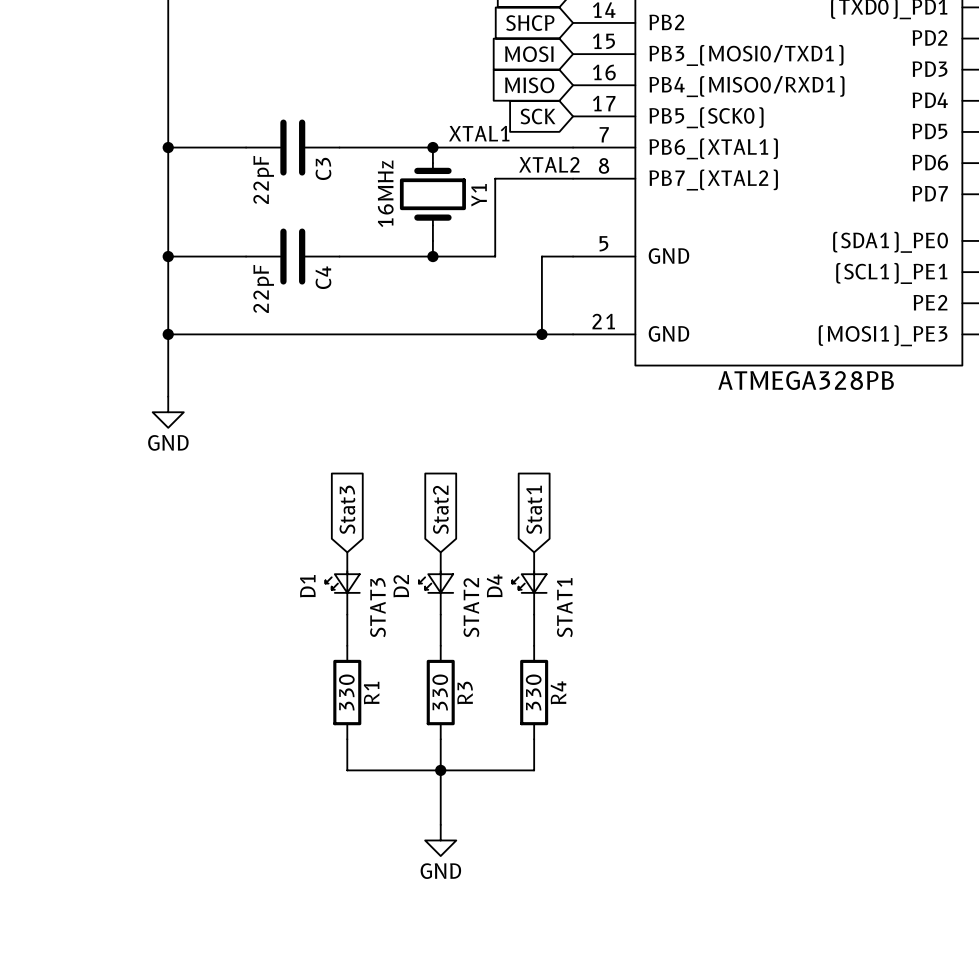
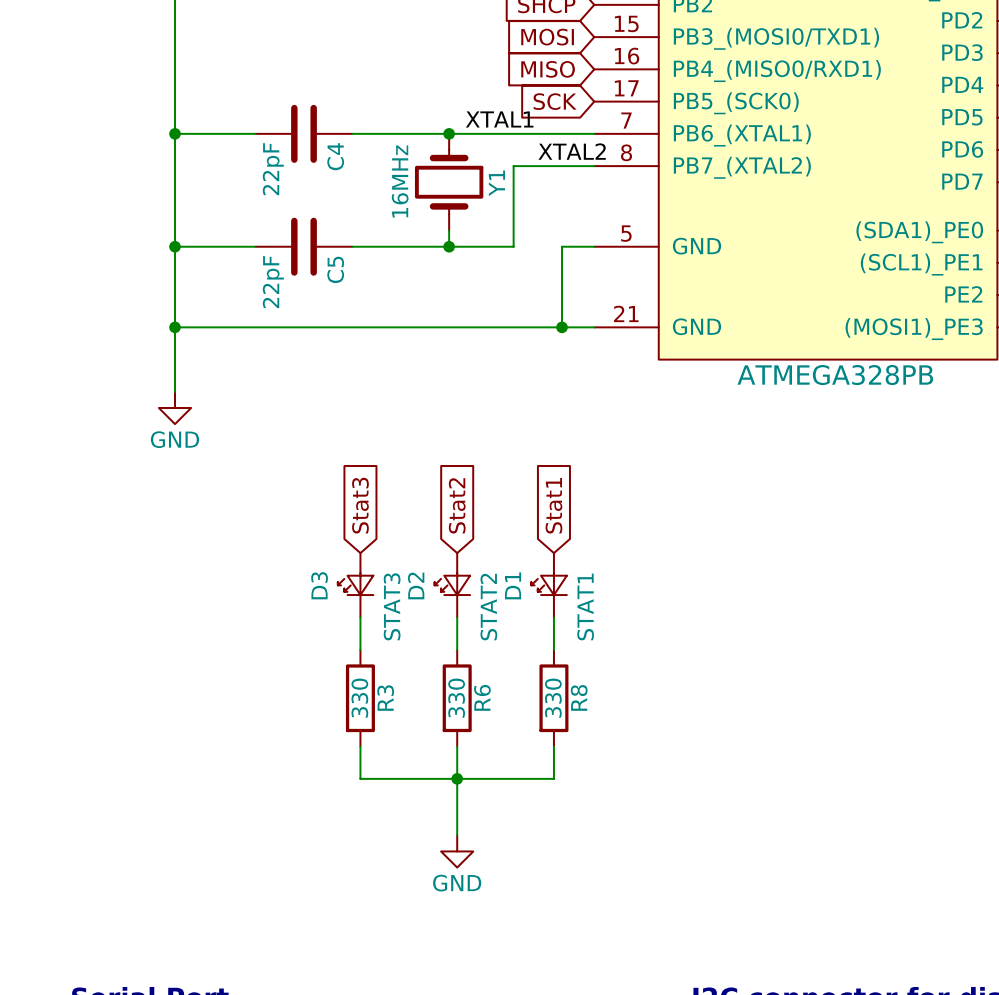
C3 name: C3 (323, 168) -> C4 (335, 156)
C4 name: C4 (323, 277) -> C5 (335, 269)
D4 name: D4 (494, 585) -> D1 (513, 585)
D1 name: D1 (307, 586) -> D3 (319, 585)
R3 name: R3 (465, 692) -> R6 (482, 697)
R4 name: R4 (558, 692) -> R8 (579, 697)
R1 name: R1 (371, 693) -> R3 (385, 698)

